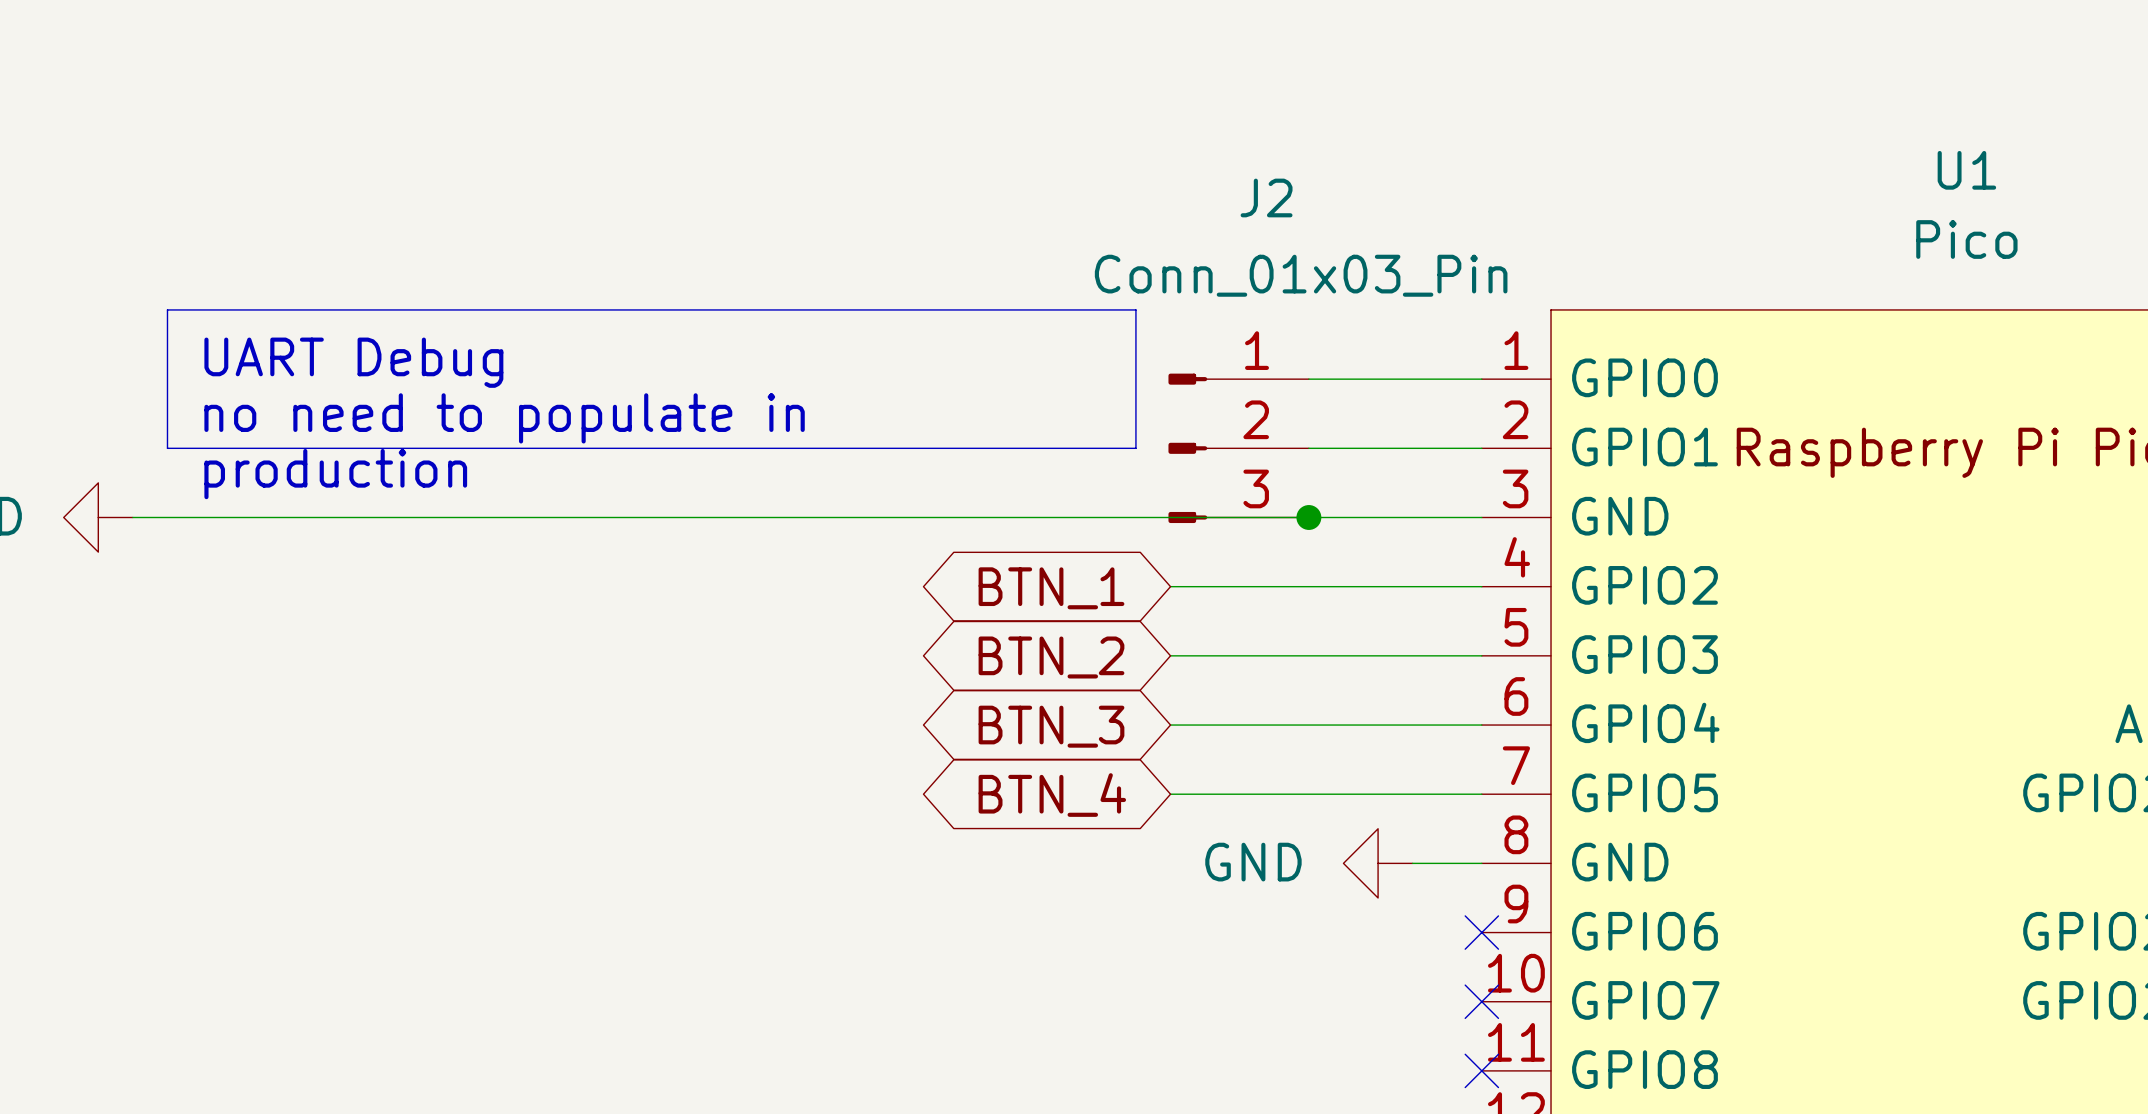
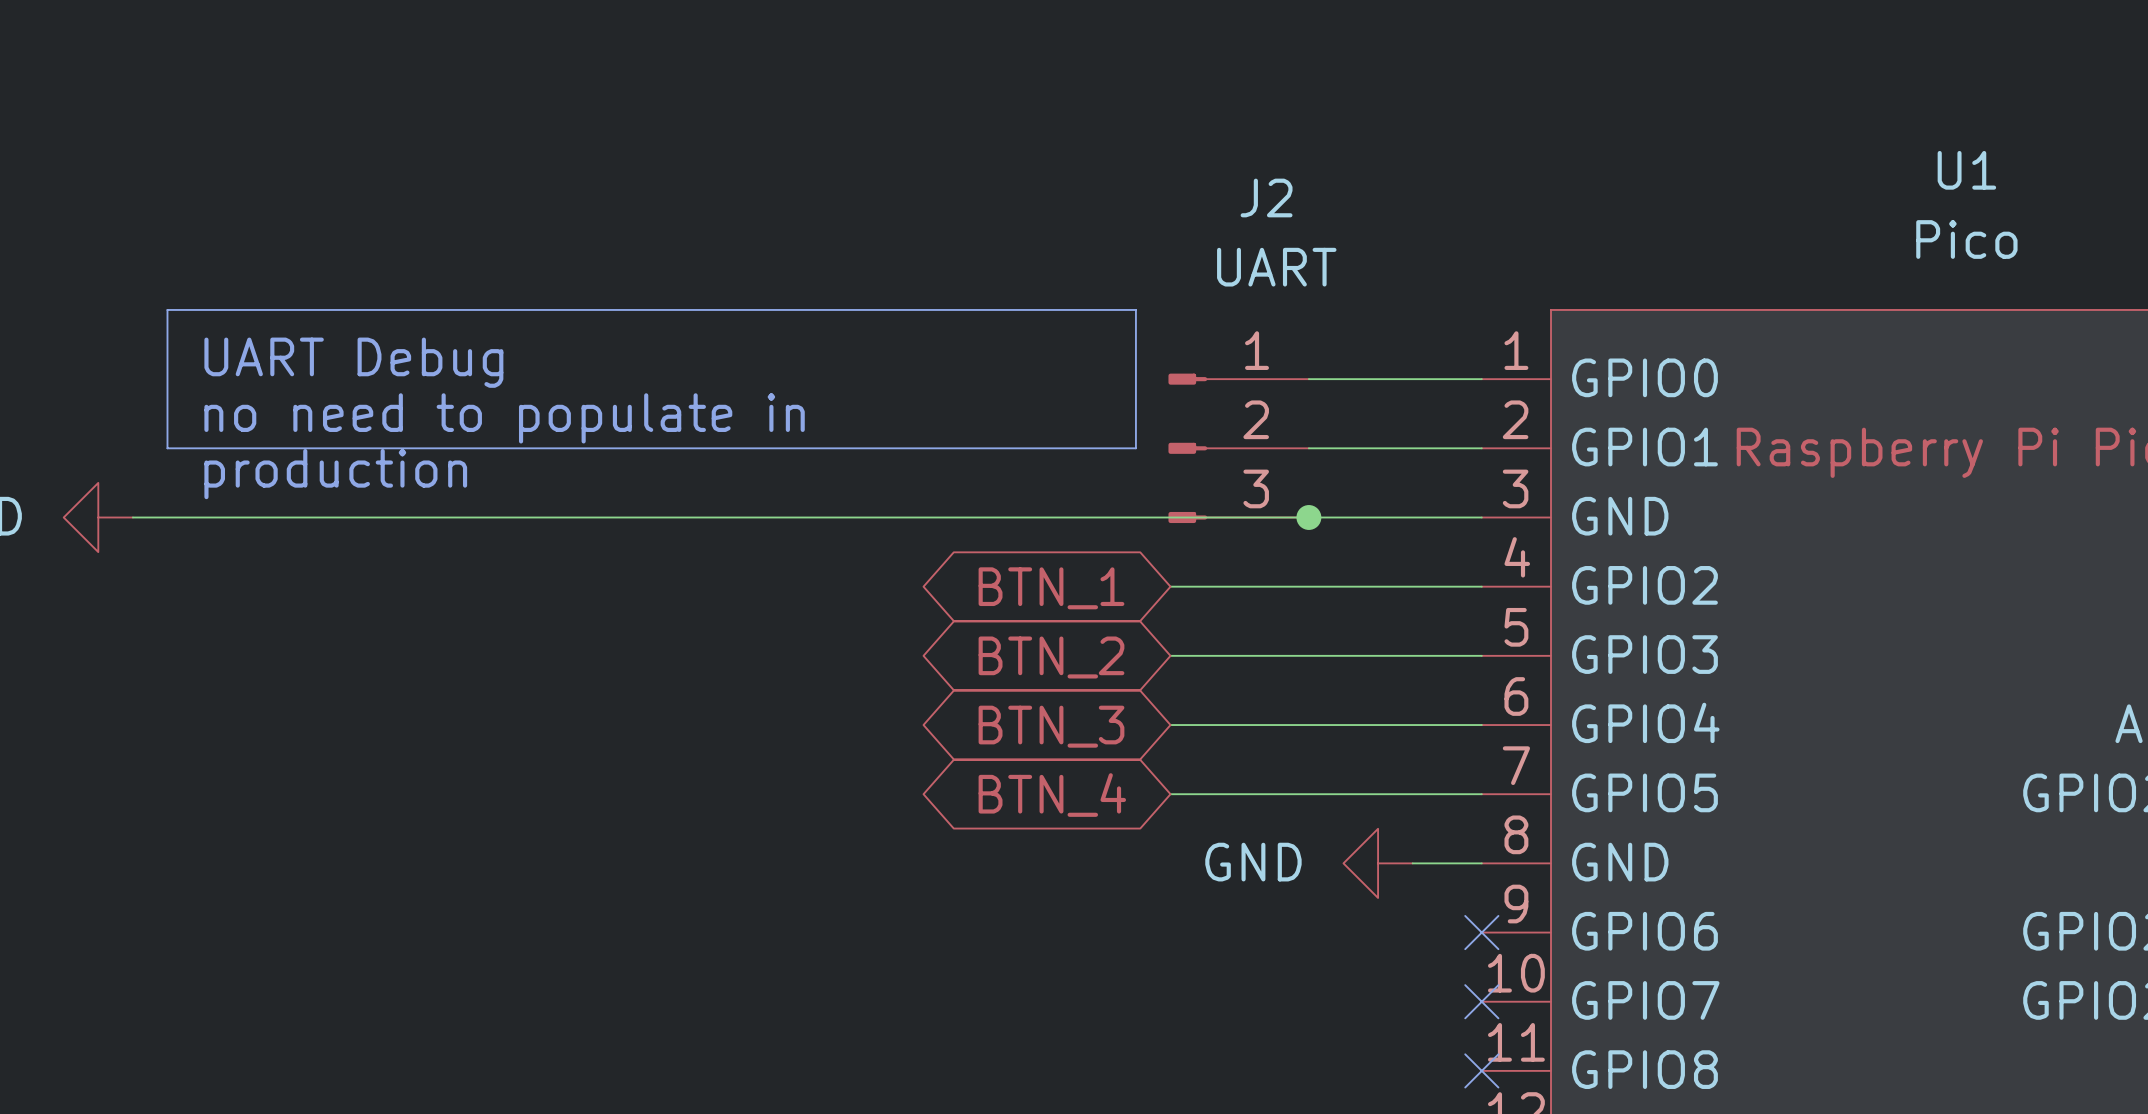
J2 value: Conn_01x03_Pin (1301, 275) -> UART (1276, 267)

